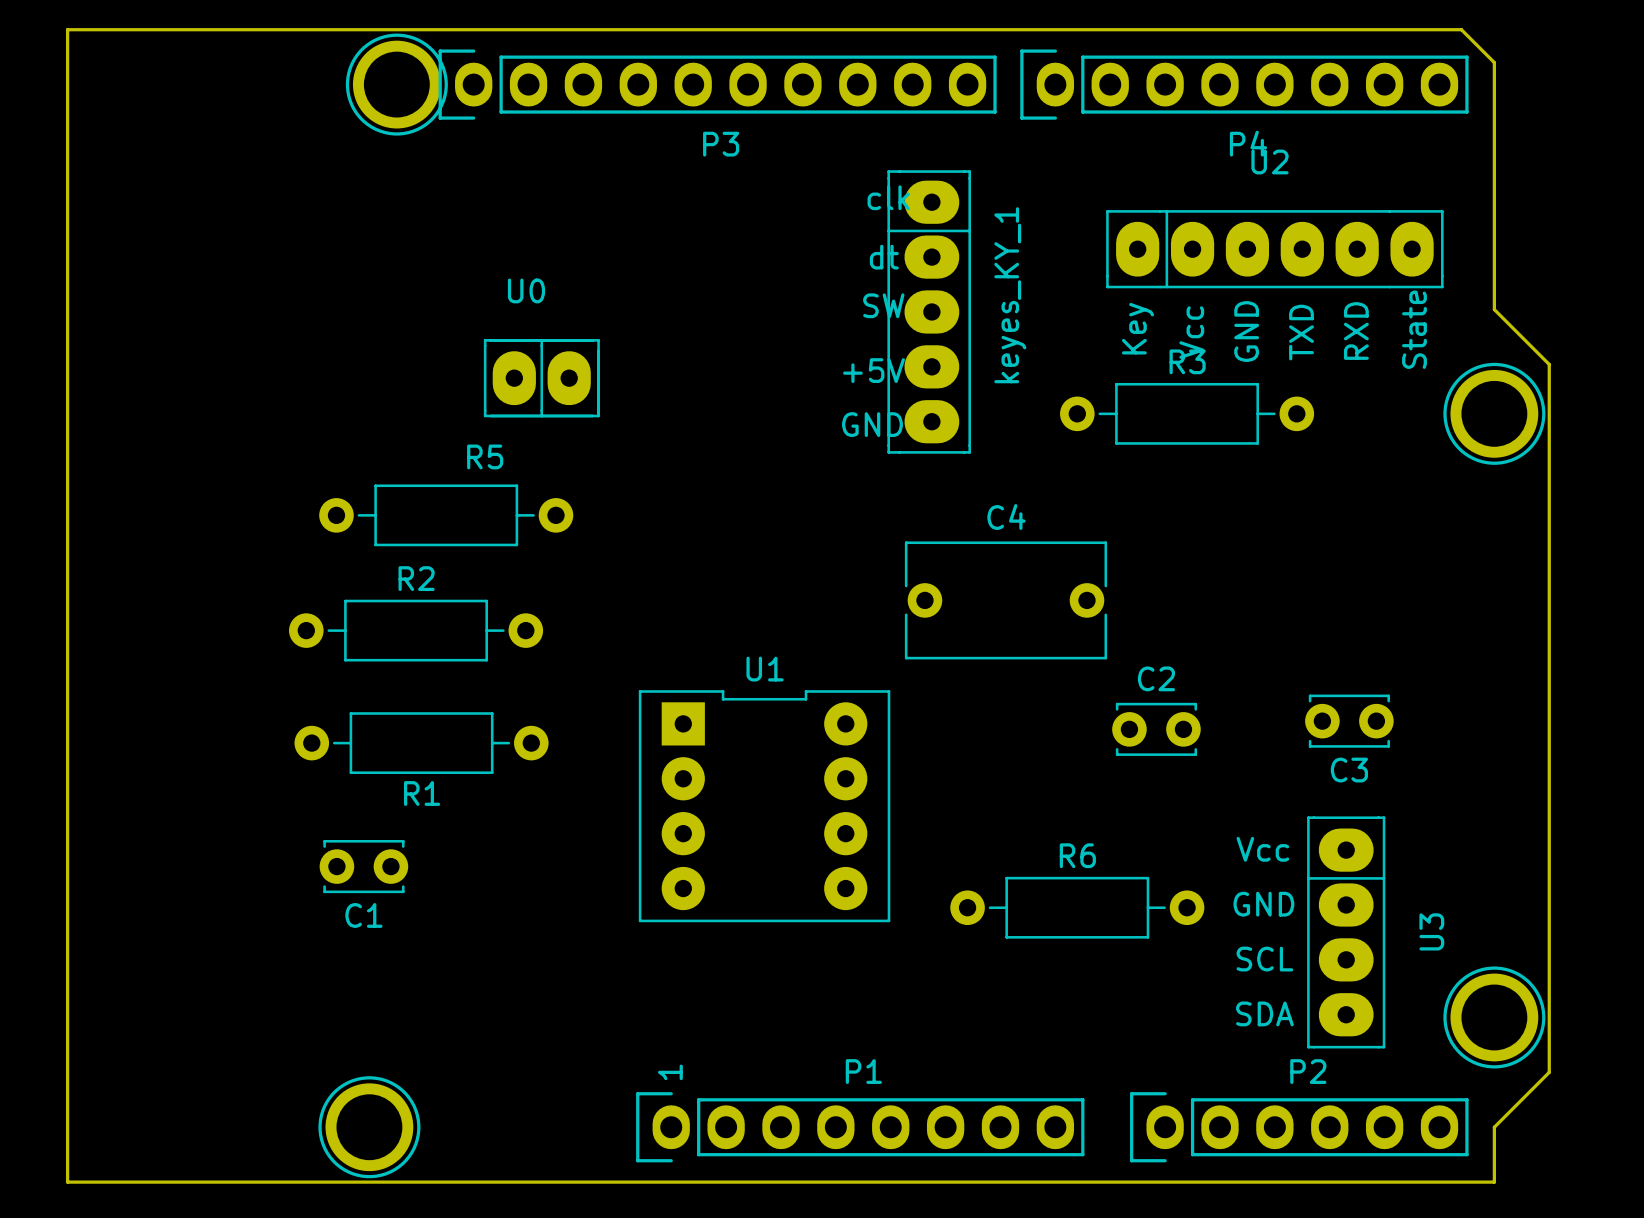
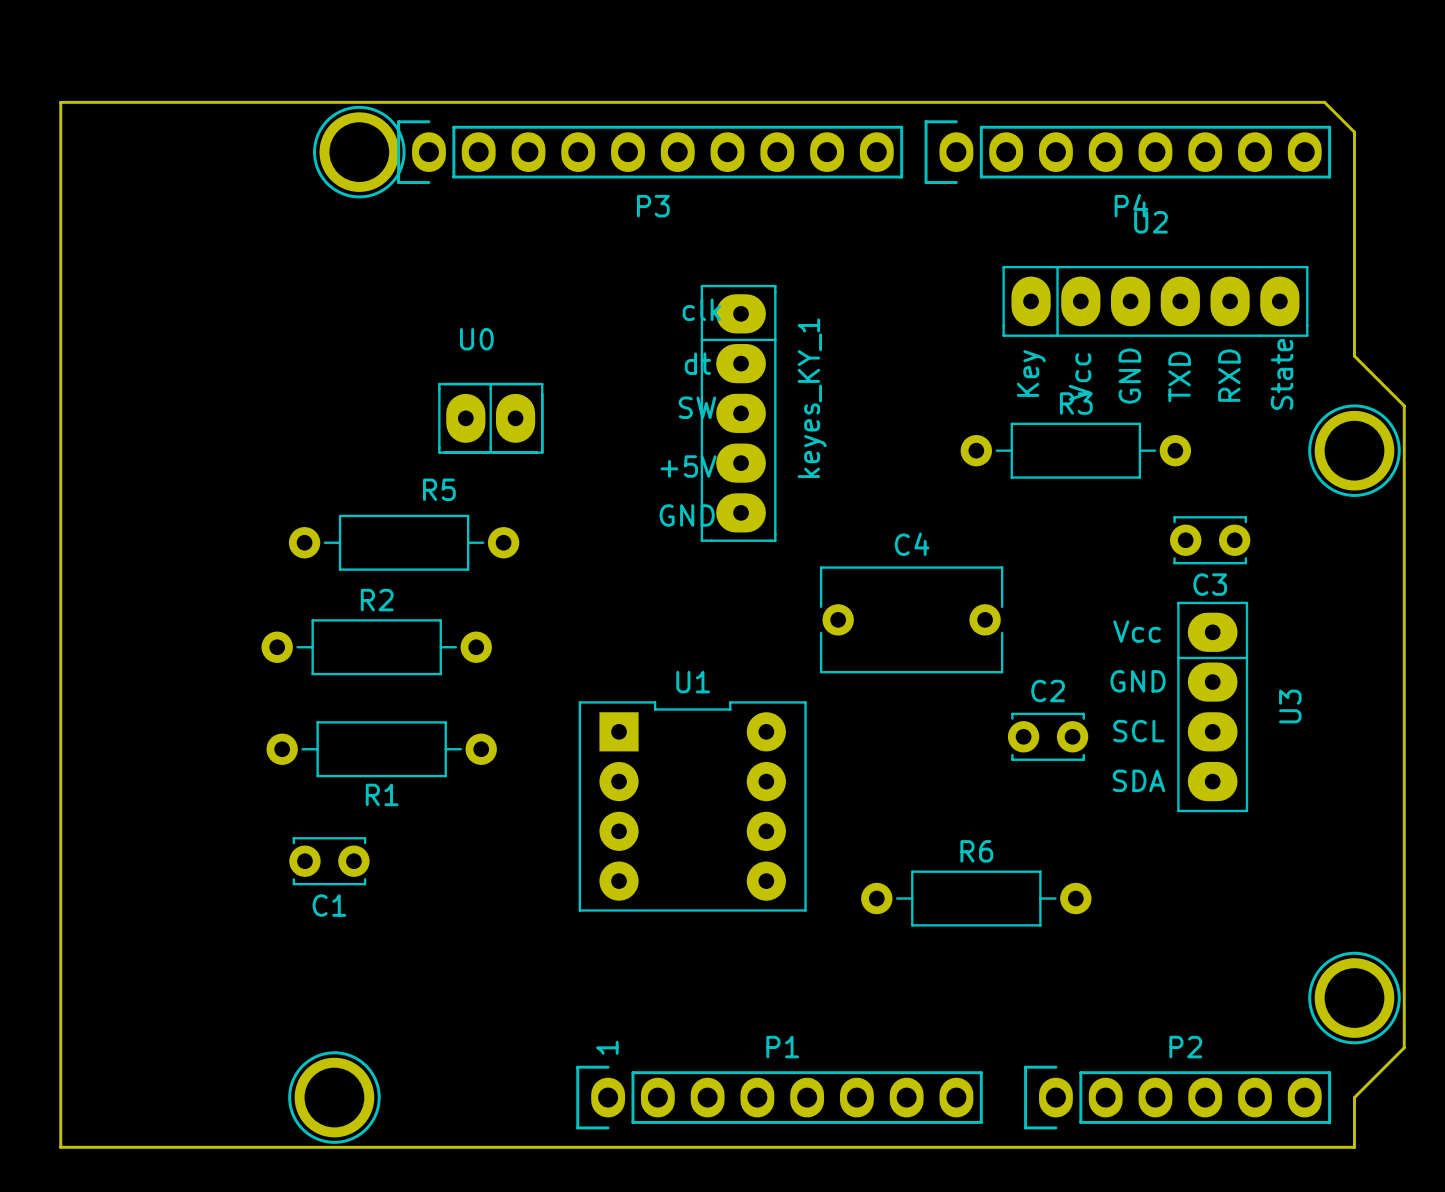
keyes_KY_1 position: (929, 311) -> (738, 413)
C3 position: (1349, 721) -> (1210, 540)
U3 position: (1346, 932) -> (1212, 706)

